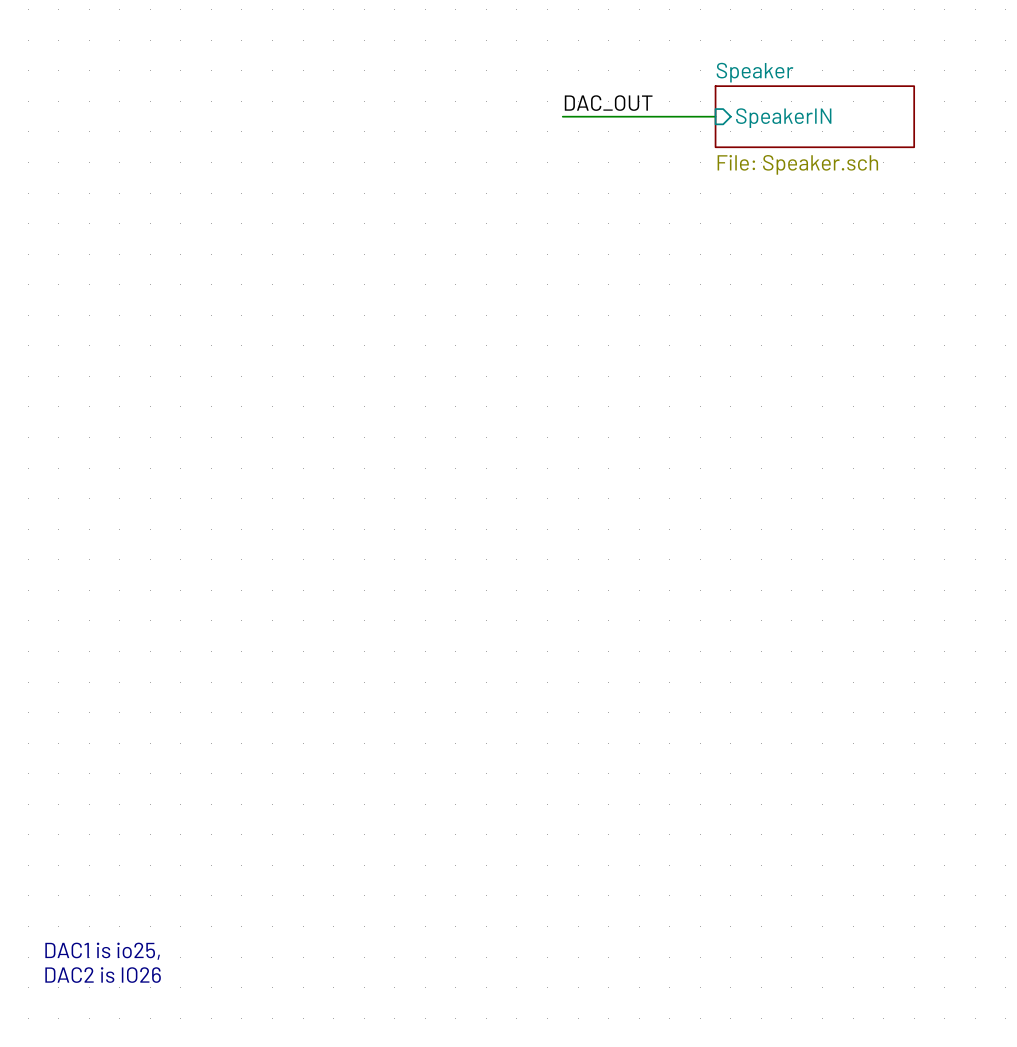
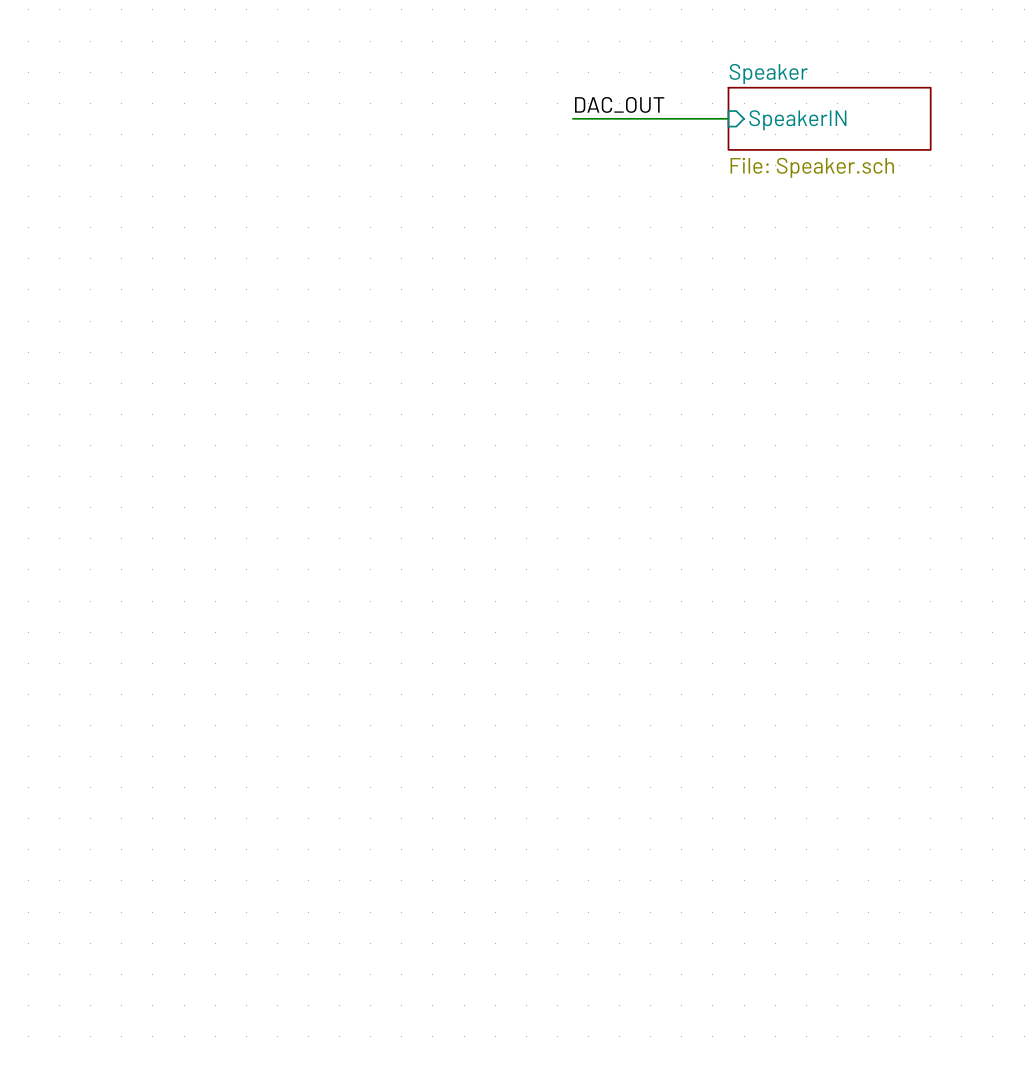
text: DAC1 is io25, (102, 951) -> none
text: DAC2 is IO26 (103, 975) -> none

